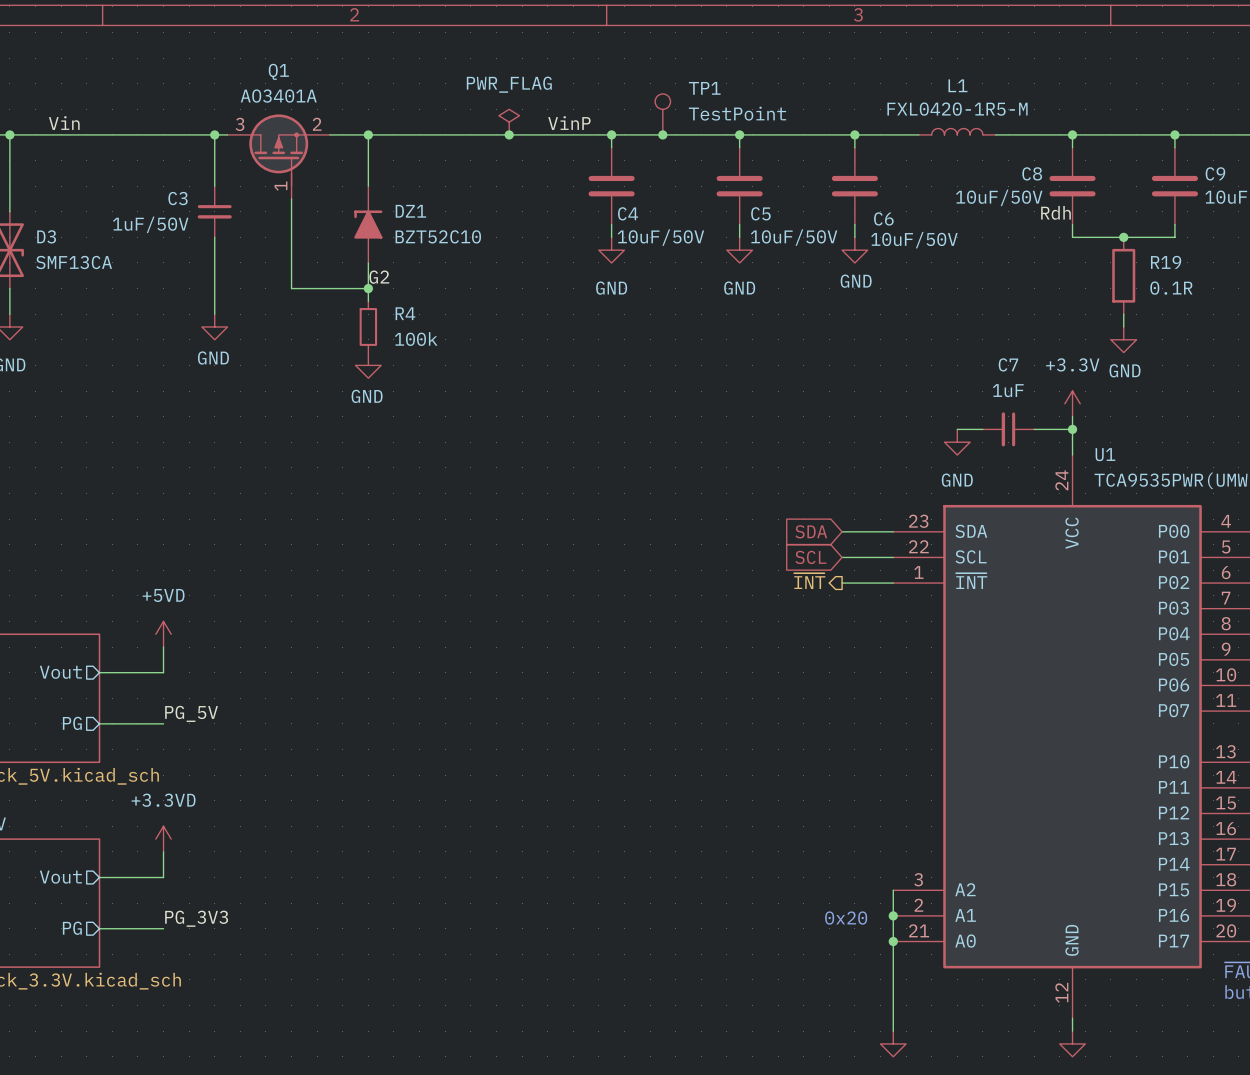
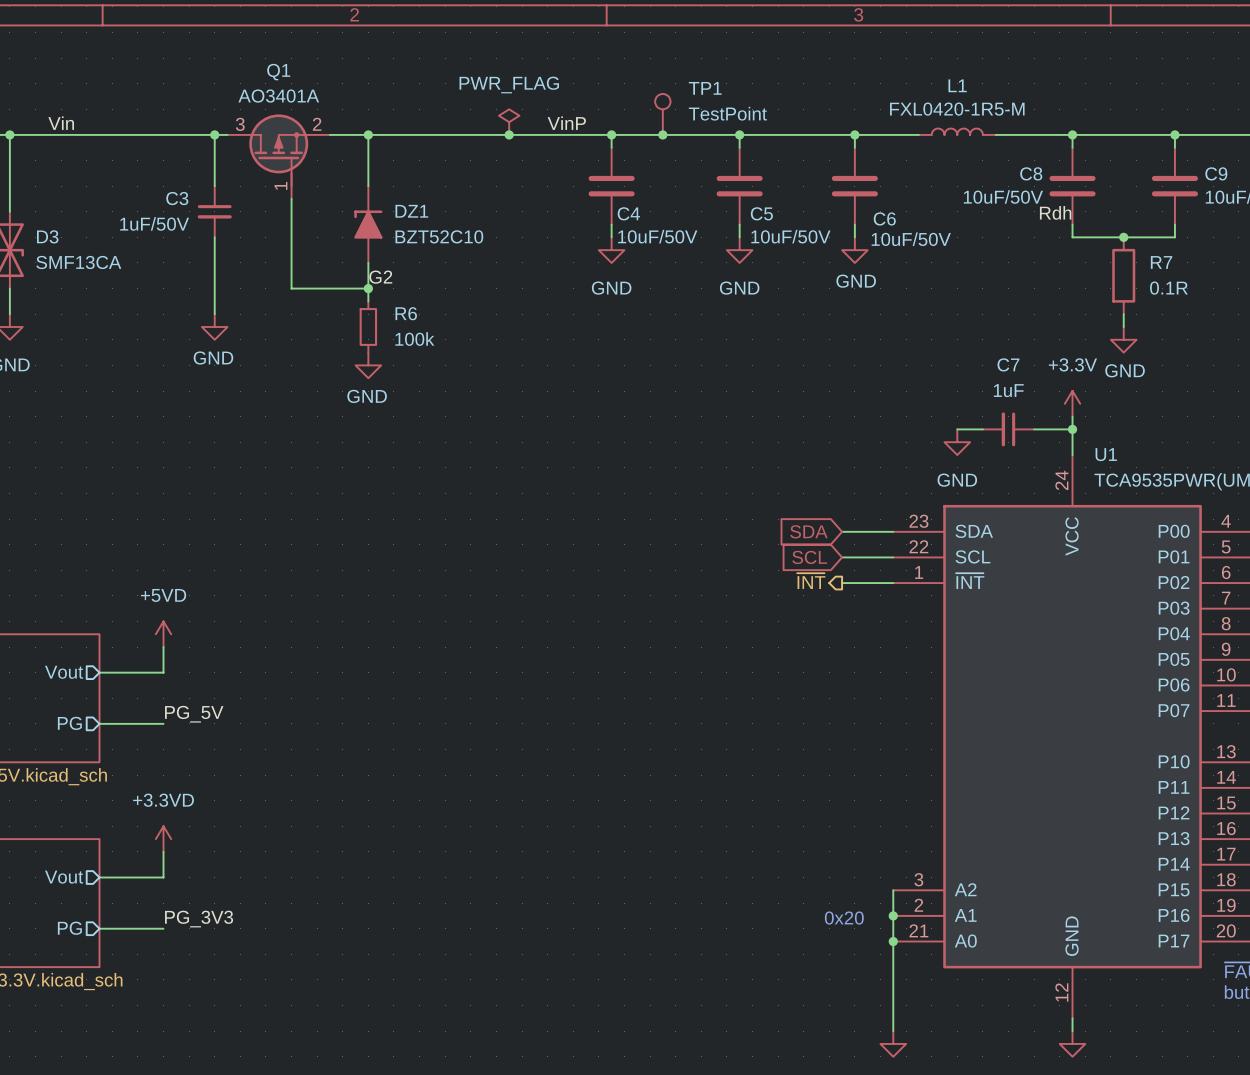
R19 name: R19 (1166, 262) -> R7 (1161, 262)
R4 name: R4 (405, 313) -> R6 (406, 313)

